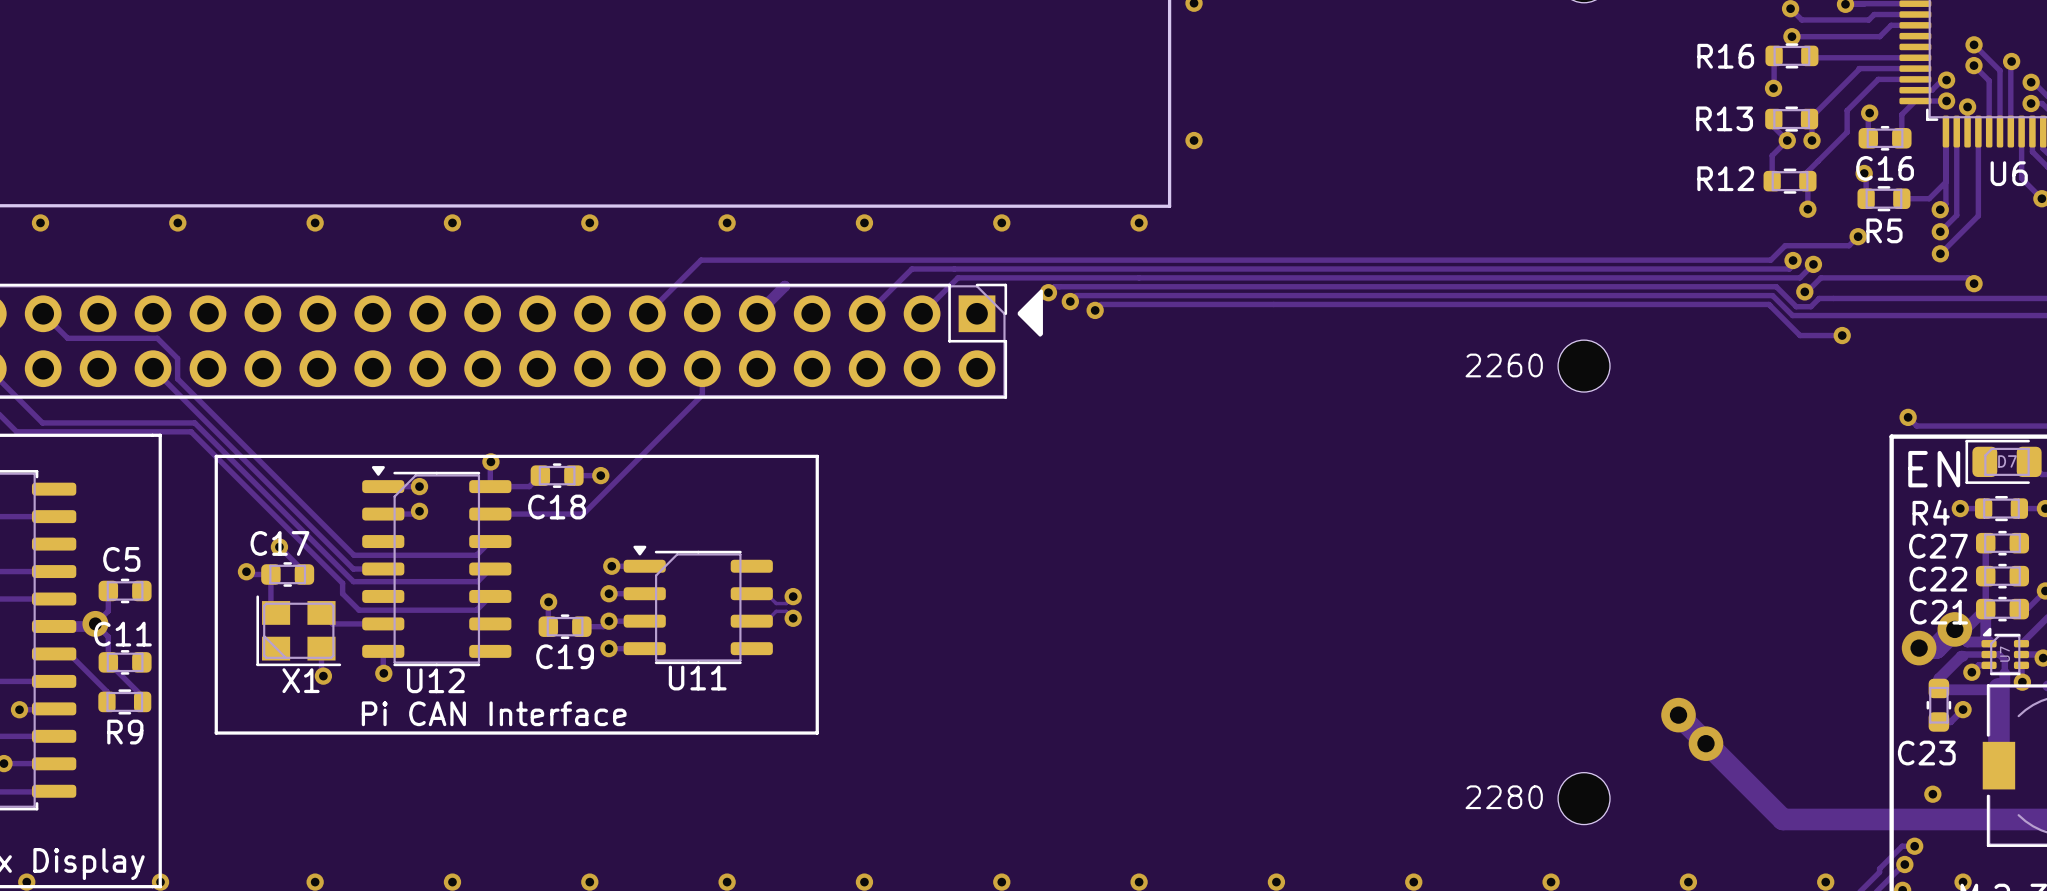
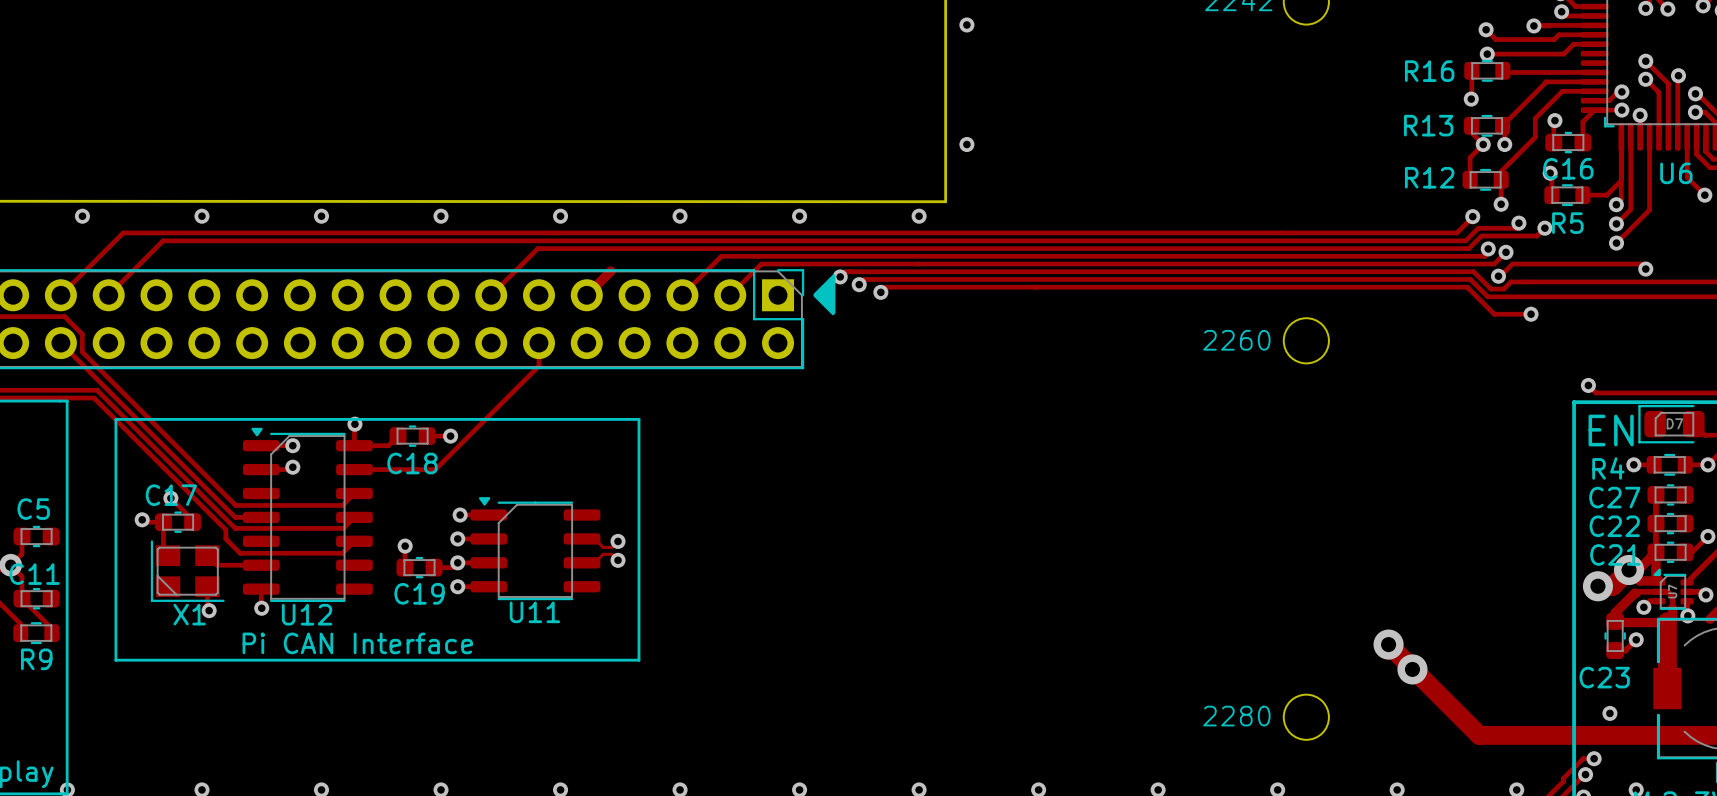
track: none -> (1472, 216) (1456, 232) (123, 232) (60, 295)
via: none -> (1472, 216)
track: none -> (1518, 223) (1516, 228) (1478, 228) (1465, 240) (163, 240) (108, 295)
via: none -> (1518, 223)

